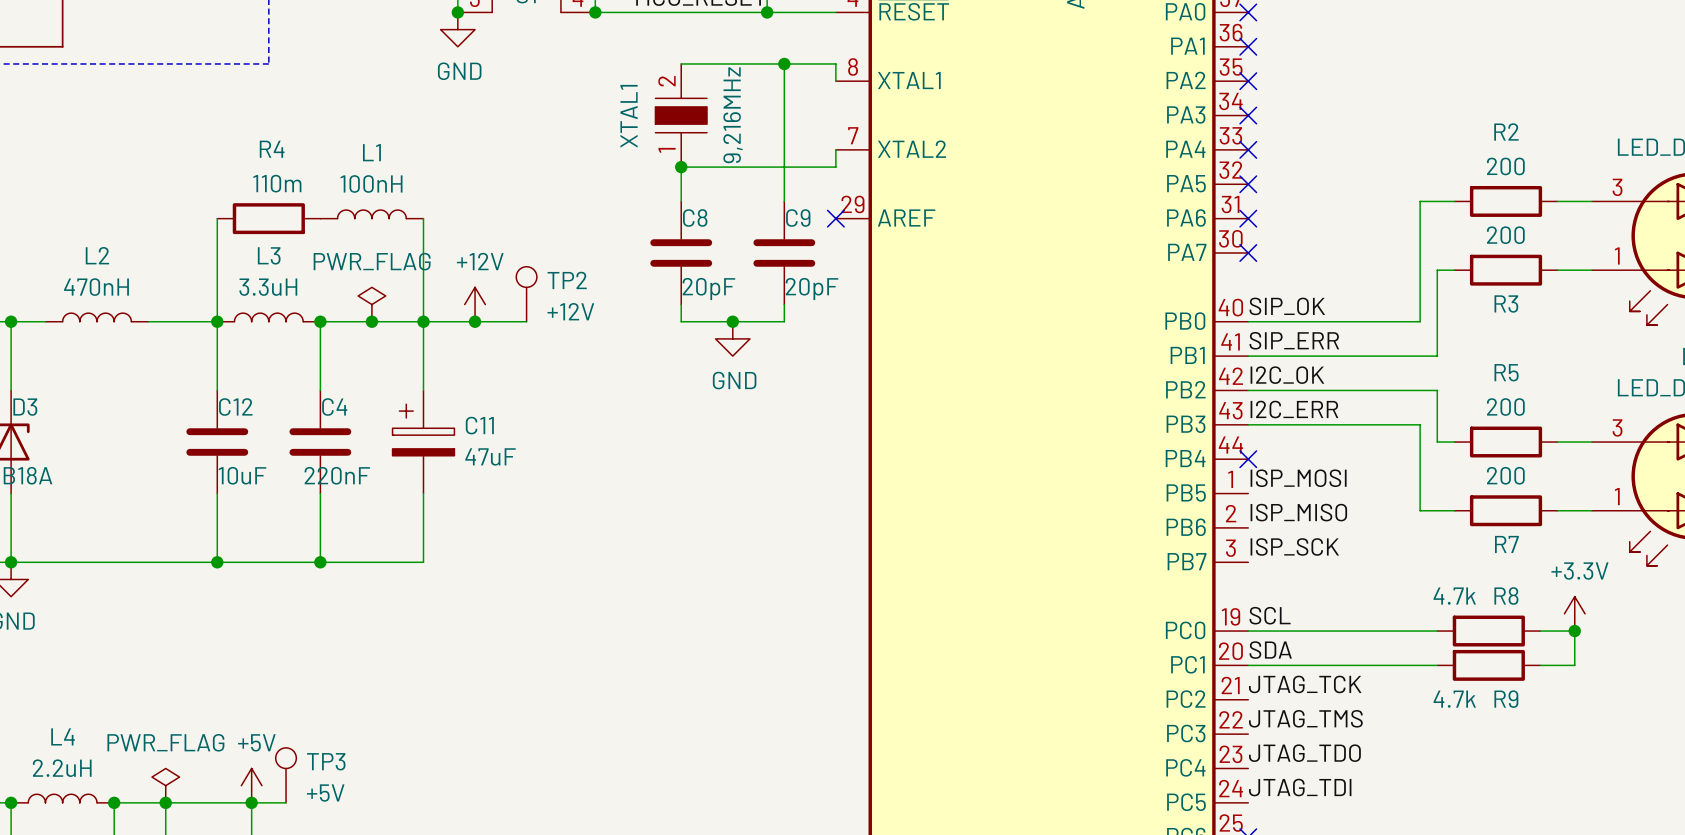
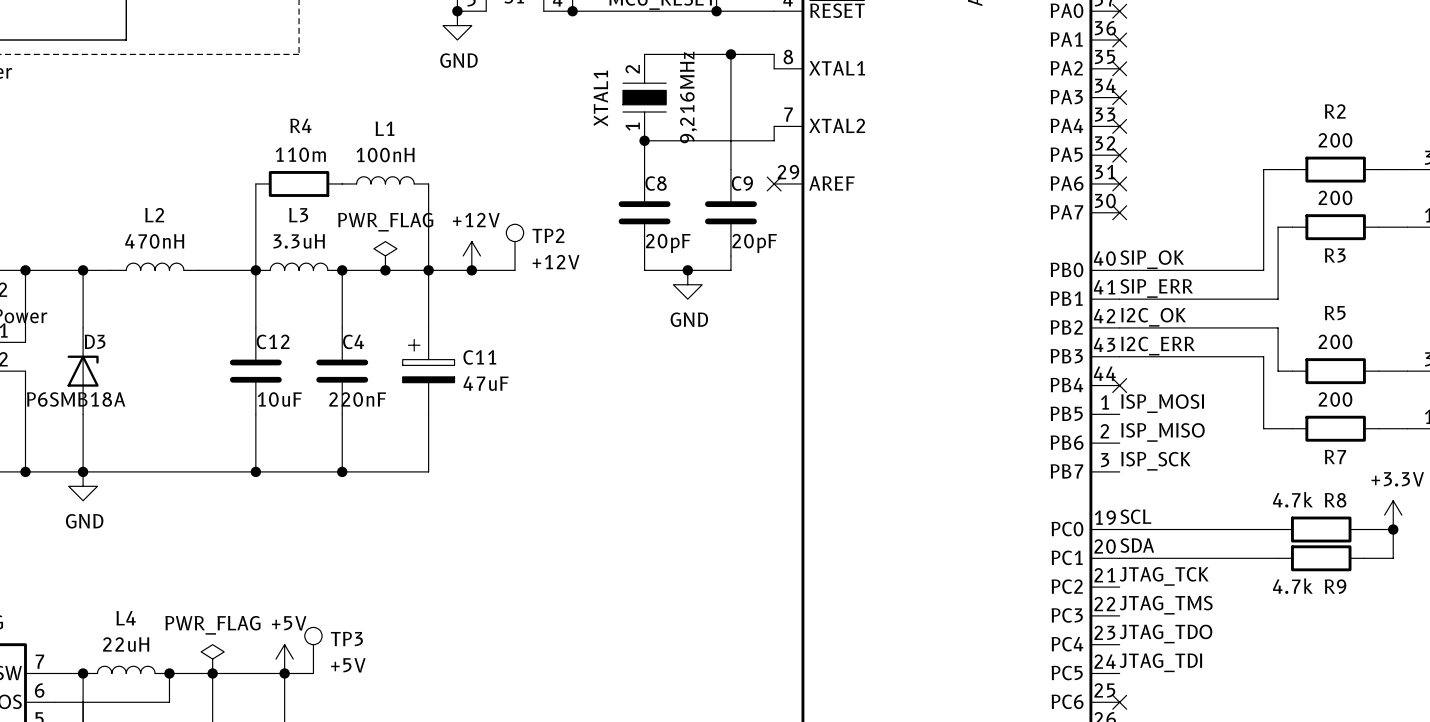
L4 value: 2.2uH (62, 768) -> 22uH (126, 644)

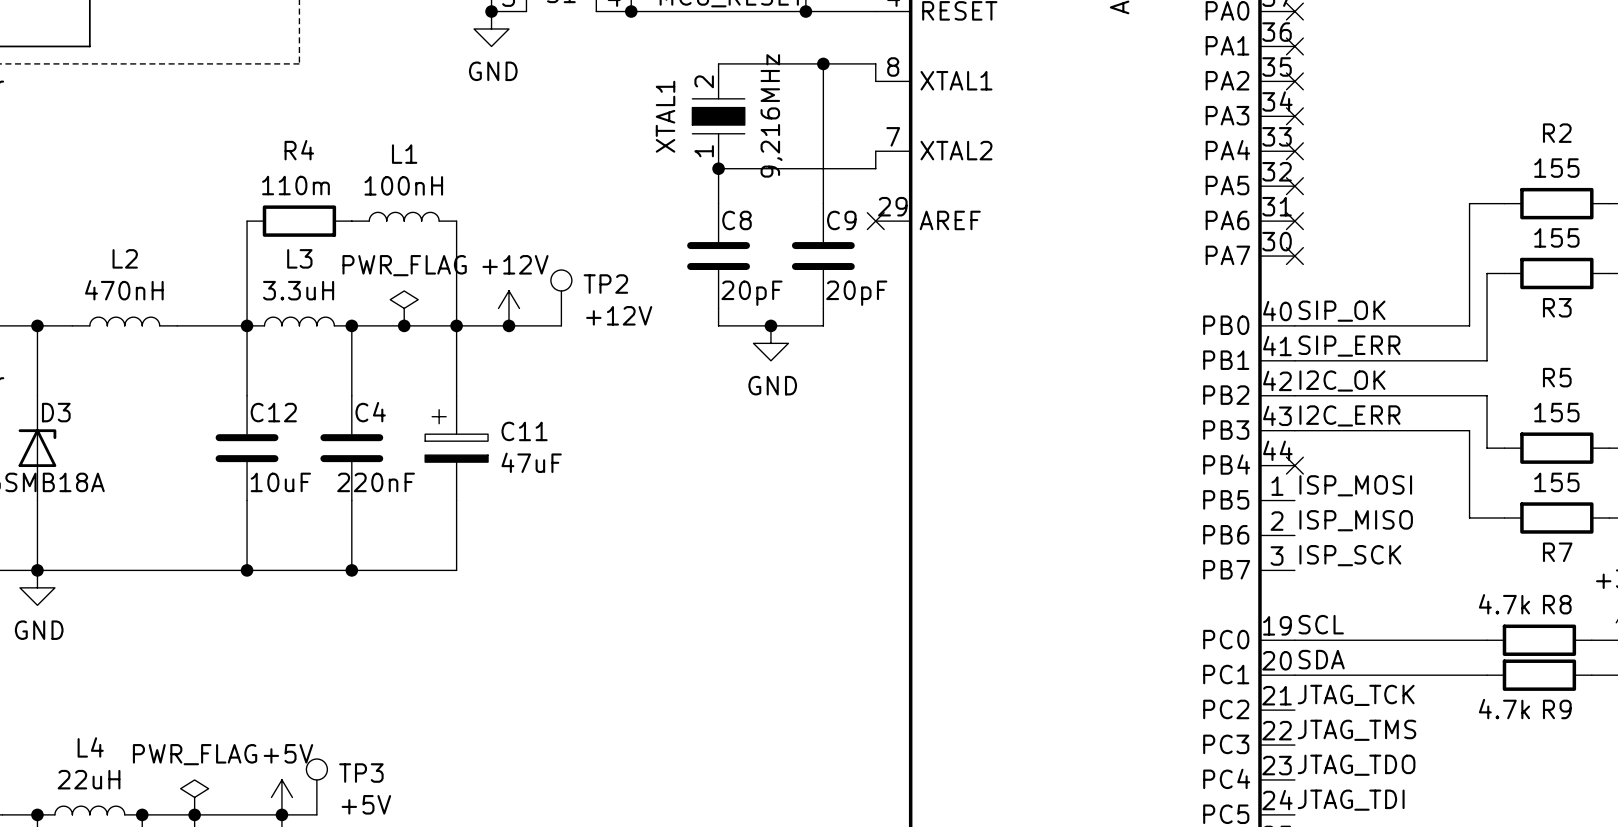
R2 value: 200 (1335, 140) -> 155 (1556, 168)
R3 value: 200 (1335, 197) -> 155 (1556, 237)
R5 value: 200 (1335, 341) -> 155 (1556, 412)
R7 value: 200 (1335, 399) -> 155 (1556, 482)

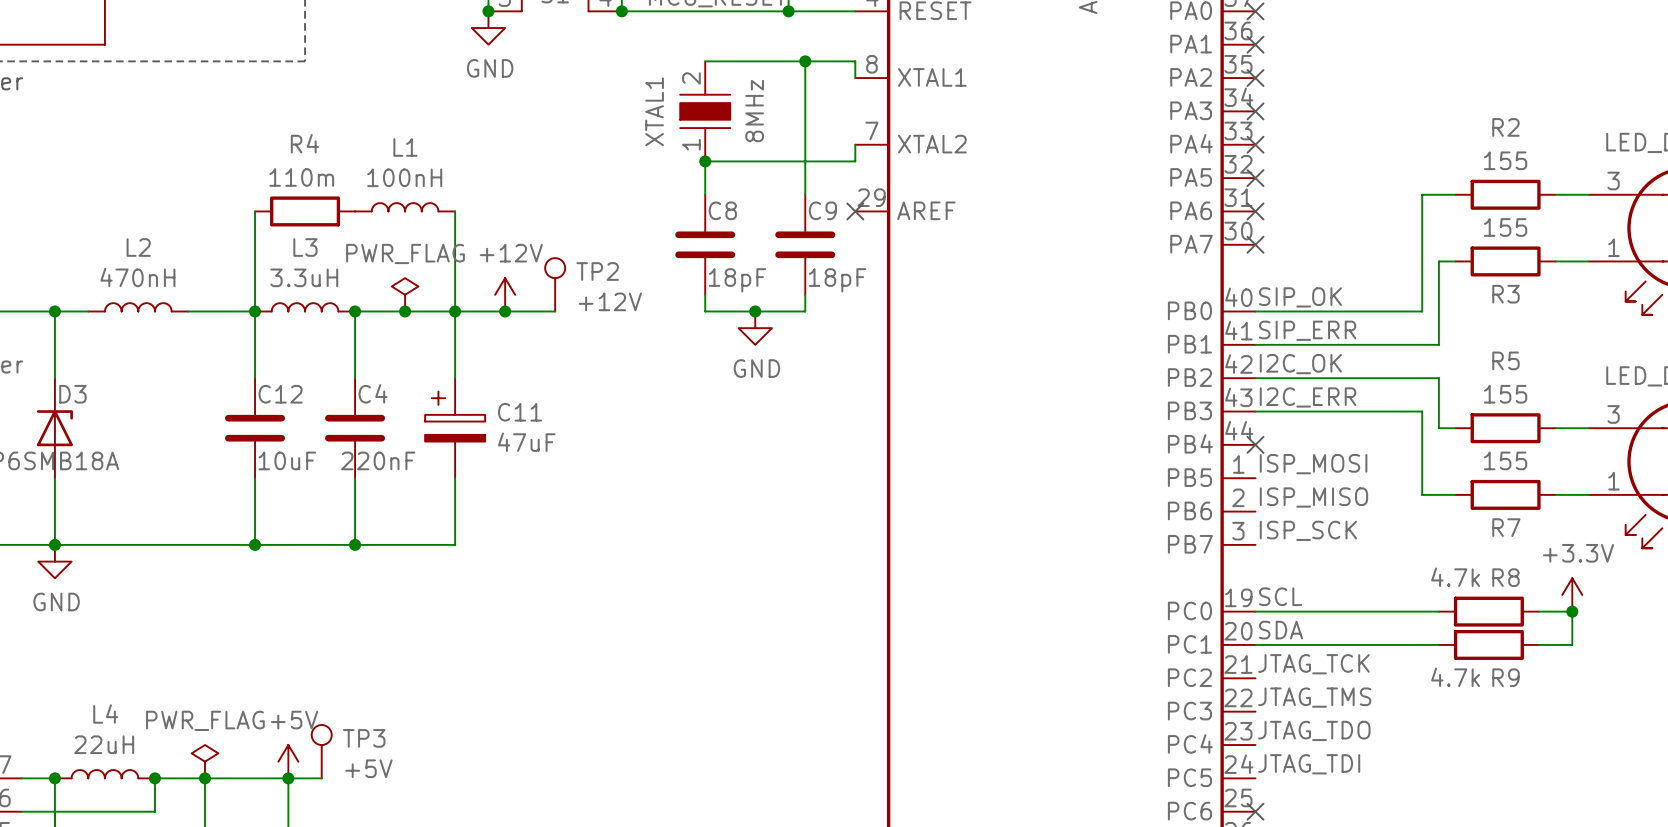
XTAL1 value: 9,216MHz (771, 115) -> 8MHz (754, 111)
C8 value: 20pF (751, 293) -> 18pF (737, 280)
C9 value: 20pF (856, 293) -> 18pF (837, 280)

